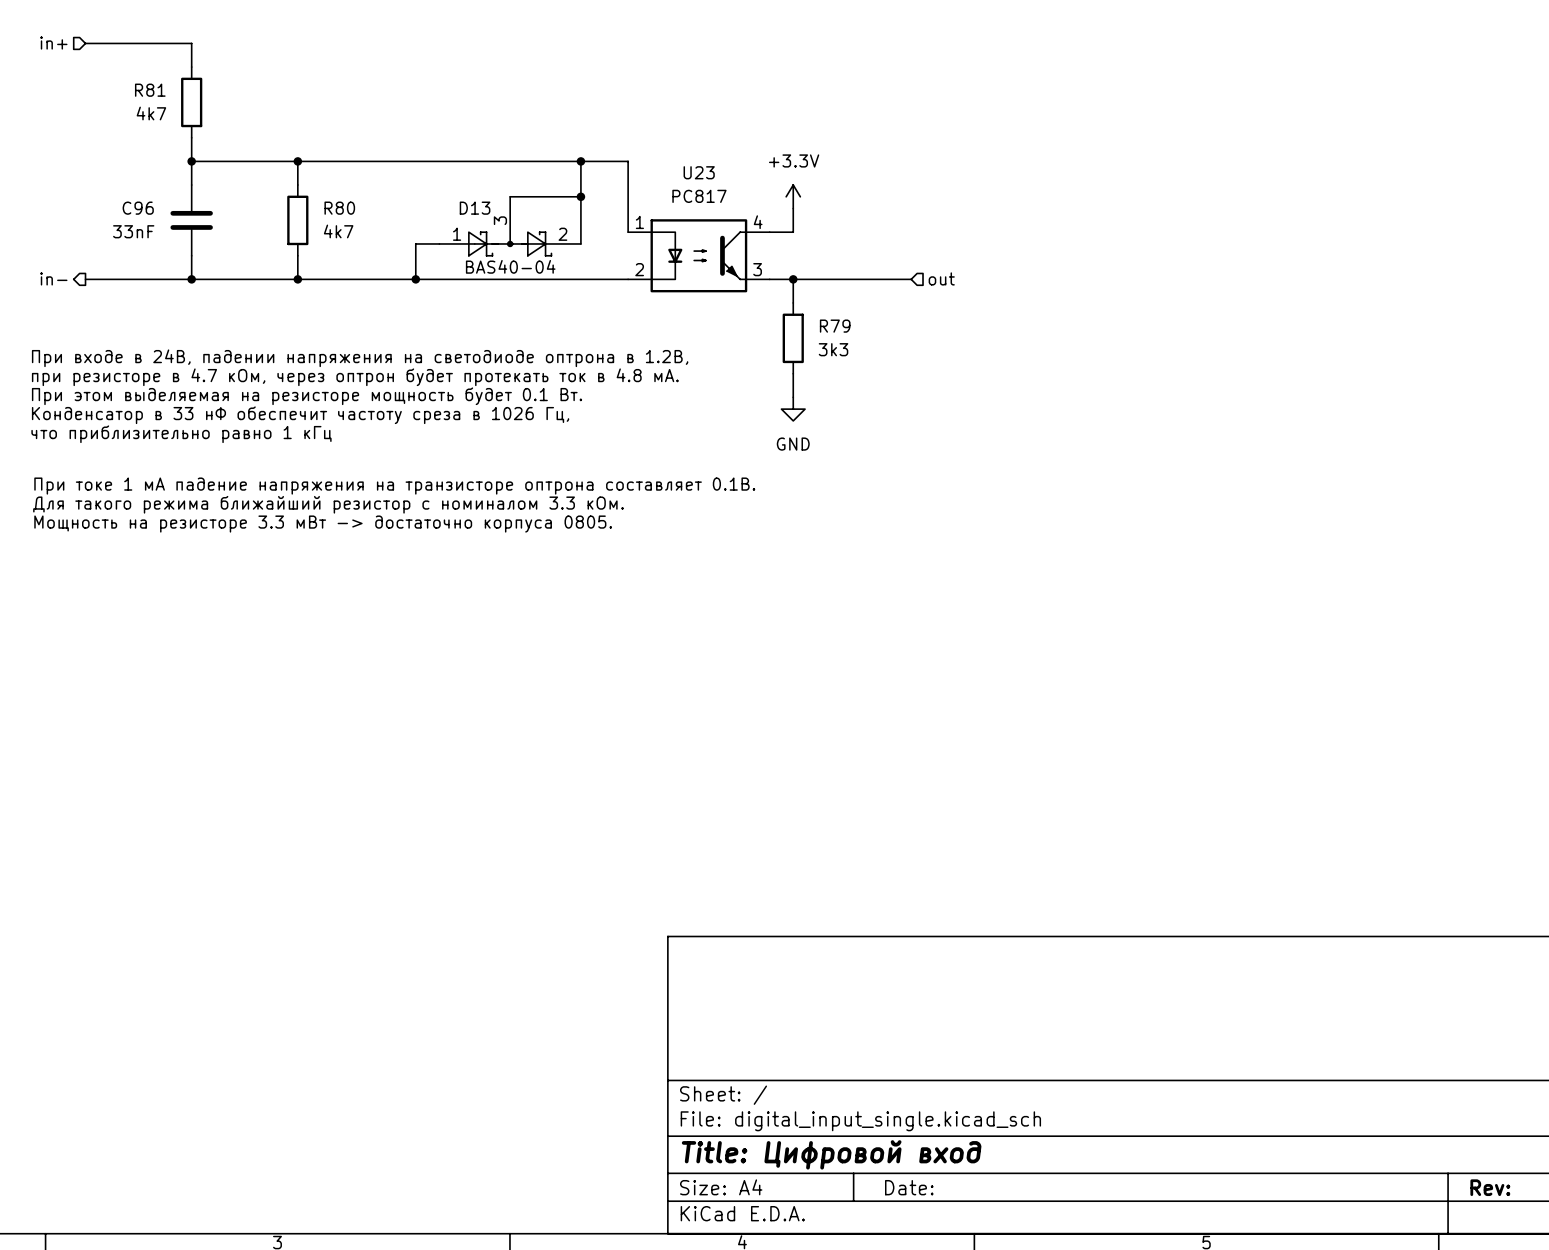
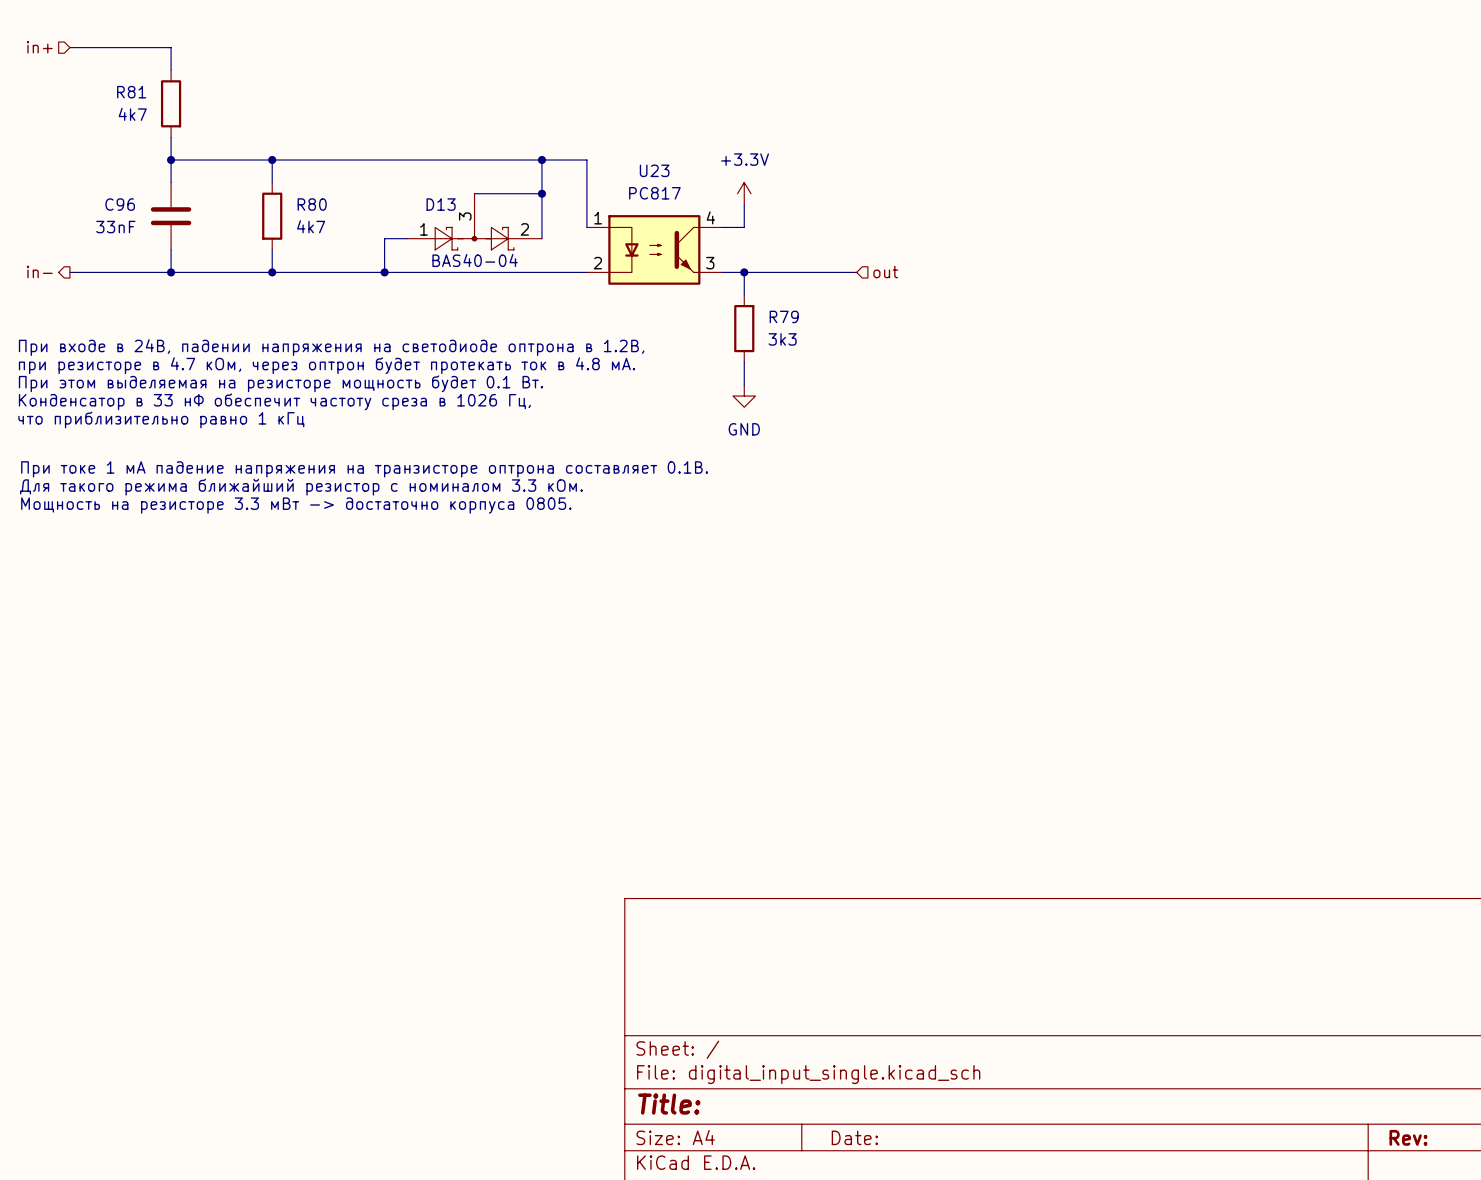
title block: Title: Цифровой вход (831, 1154) -> Title: (669, 1104)

